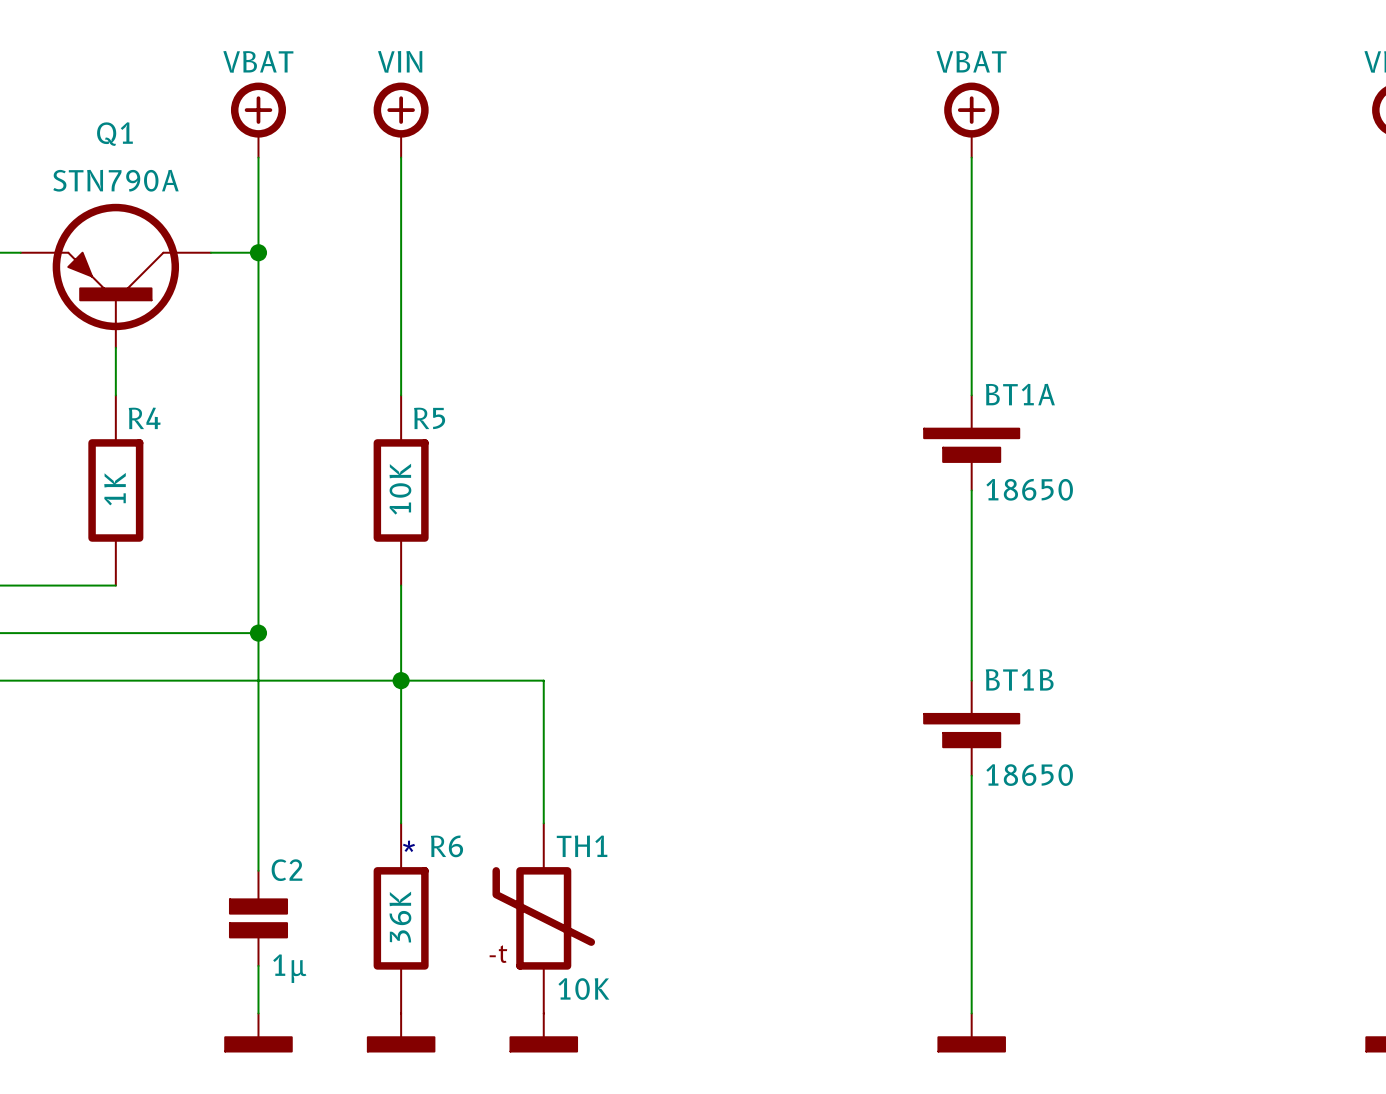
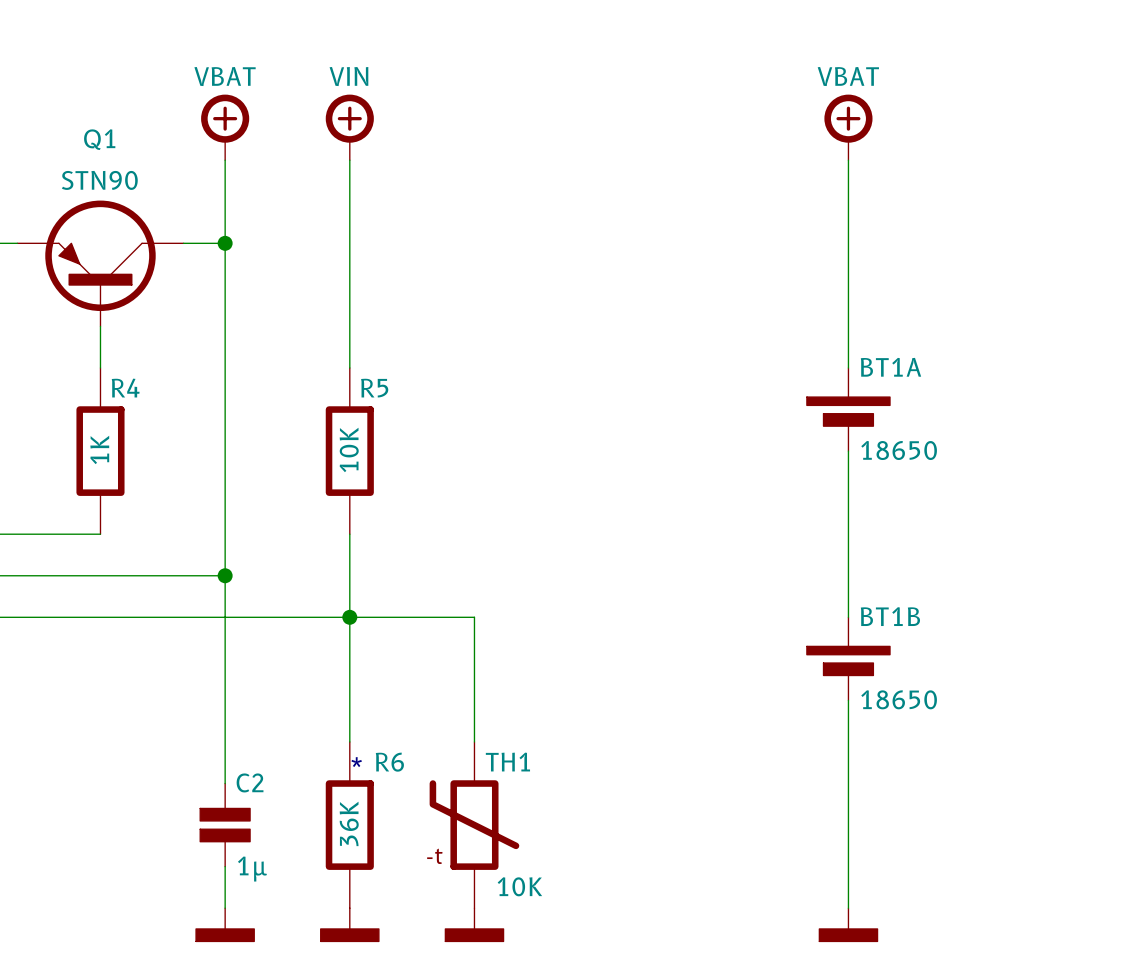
Q1 text: none -> STN90 (99, 180)
Q1 value: STN790A (115, 180) -> none
TH1 value: 10K (583, 989) -> none
TH1 text: none -> 10K (519, 886)

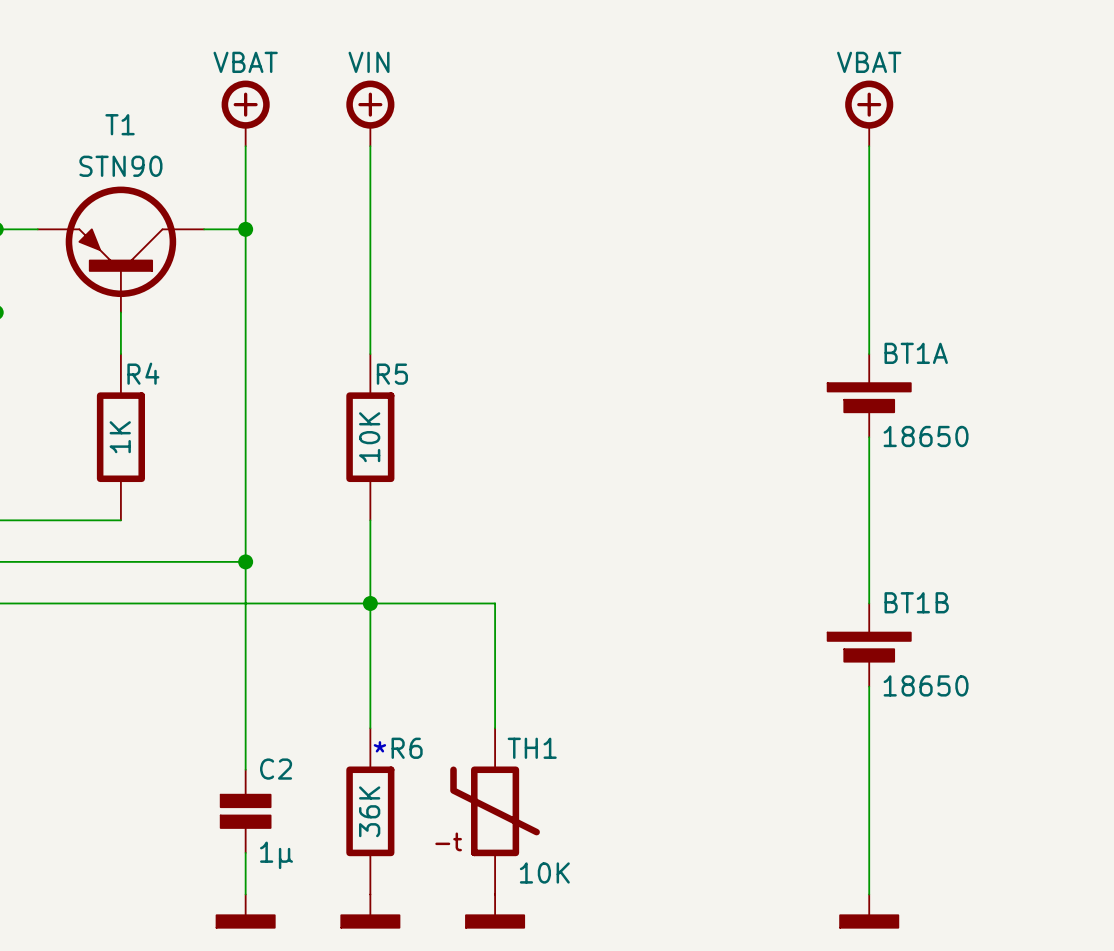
Q1 name: Q1 (99, 139) -> T1 (120, 124)

